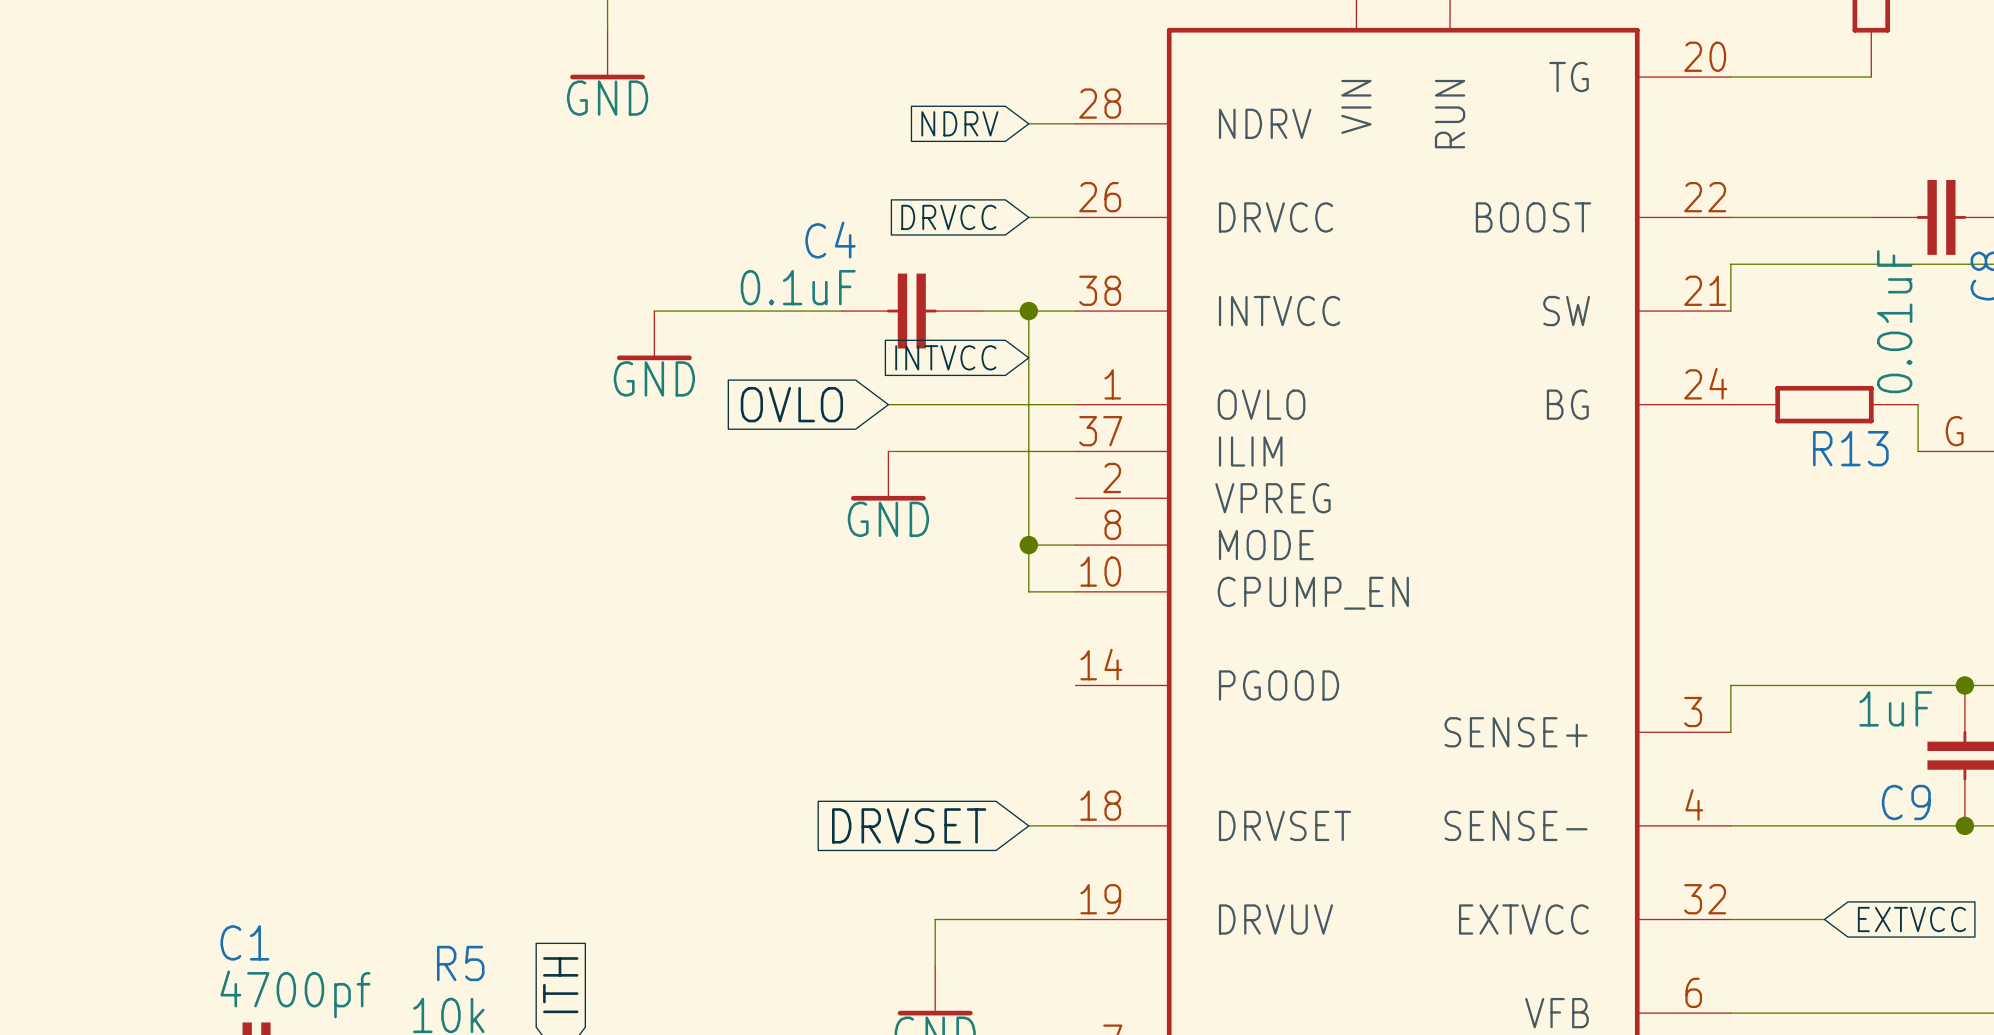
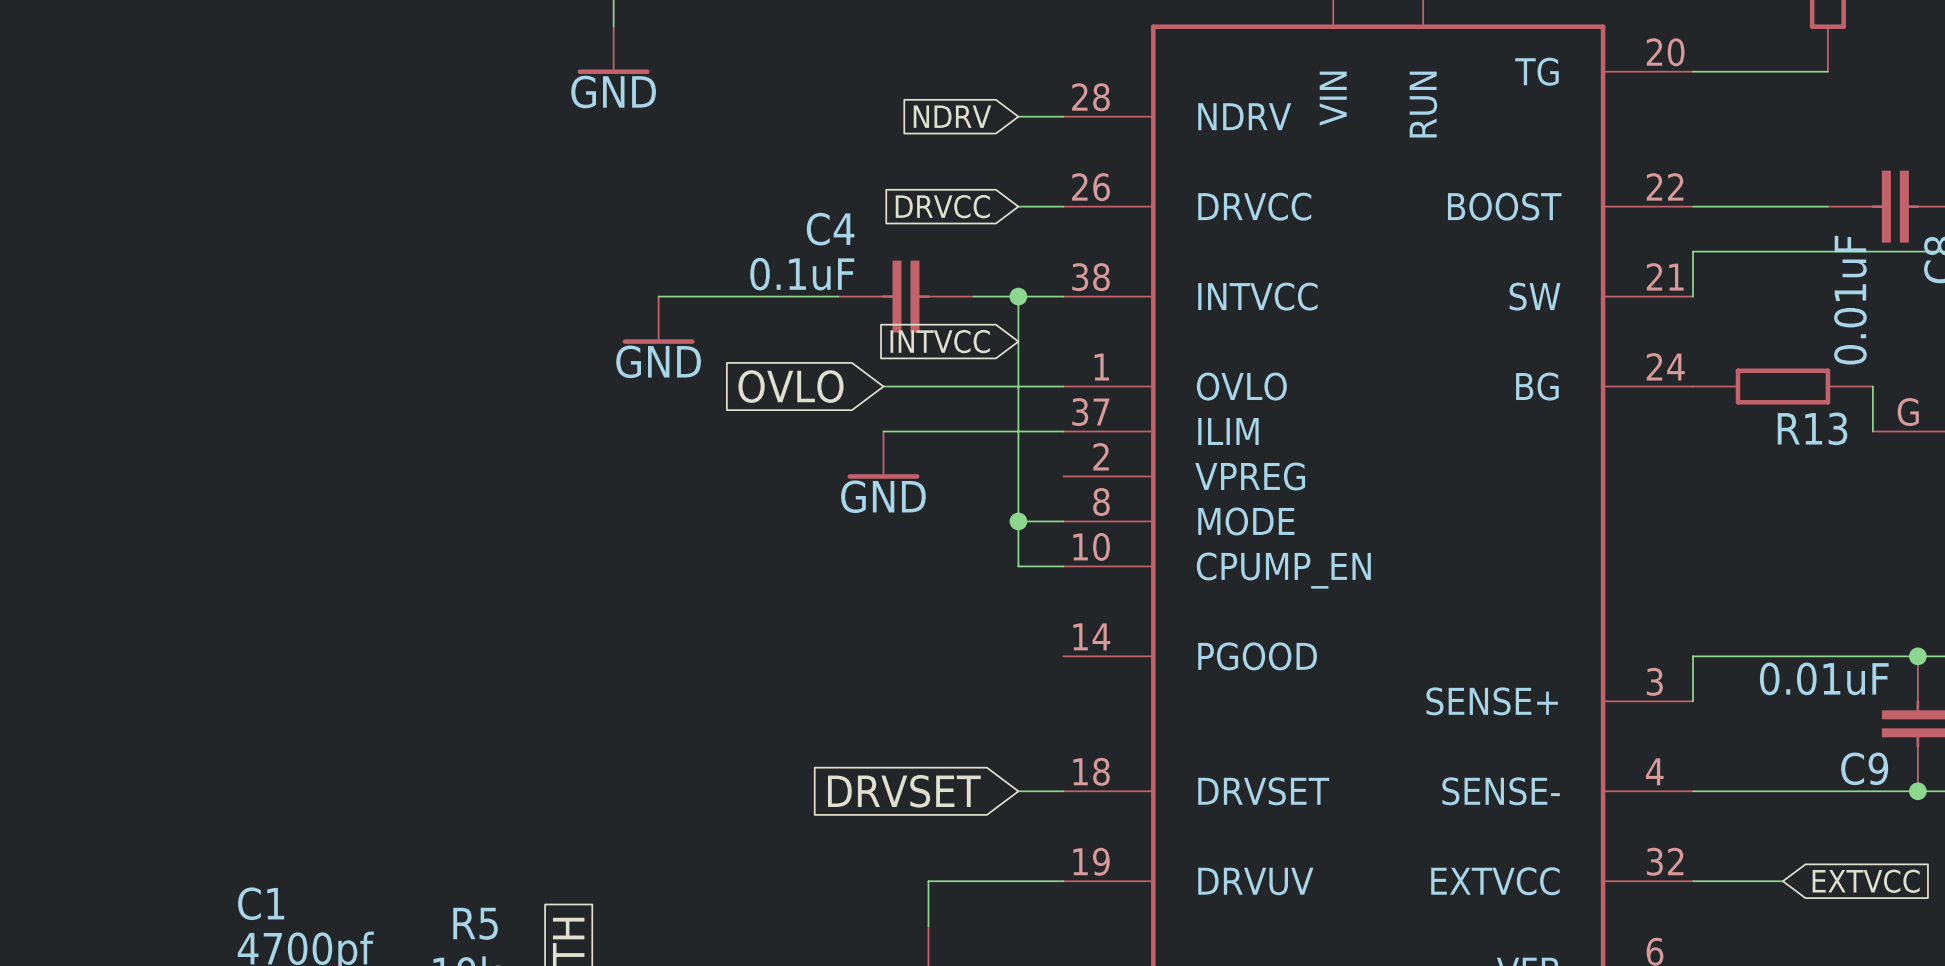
C9 value: 1uF (1895, 708) -> 0.01uF (1824, 678)

